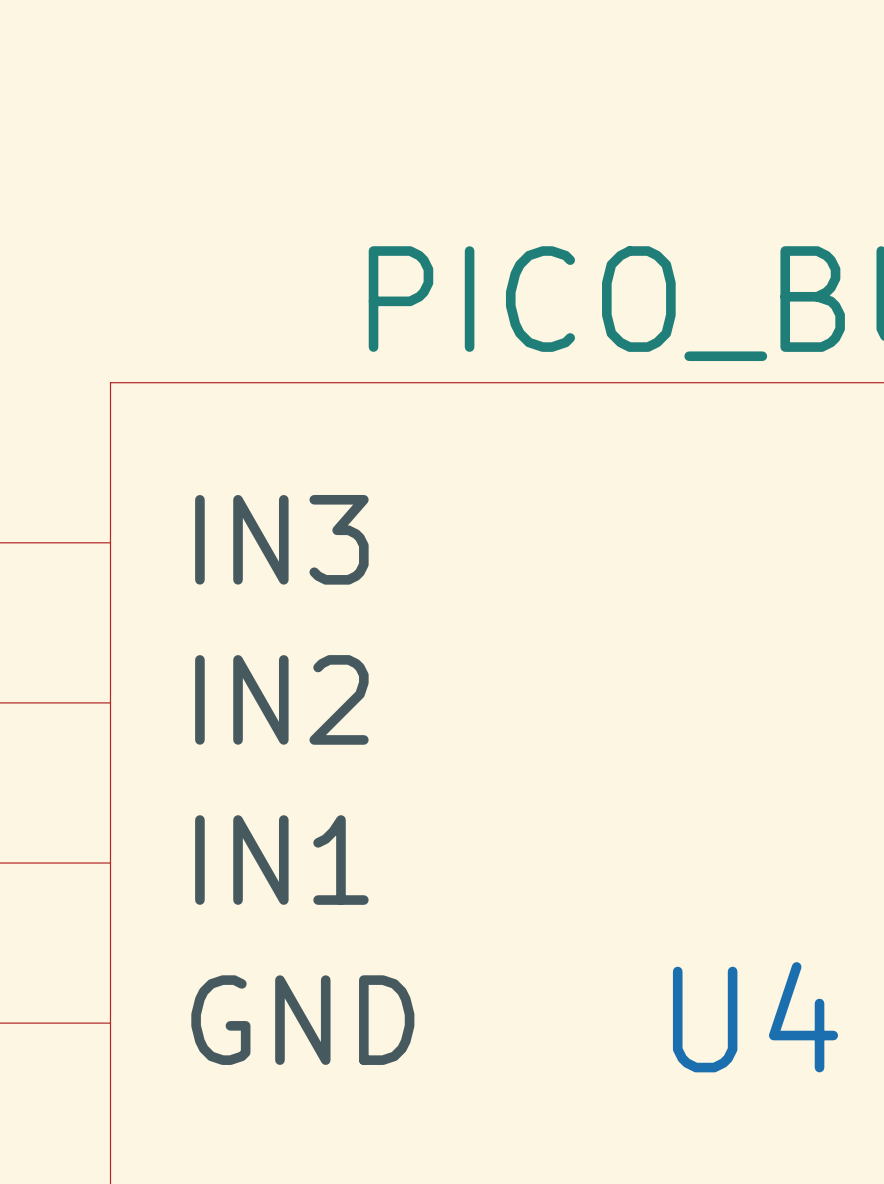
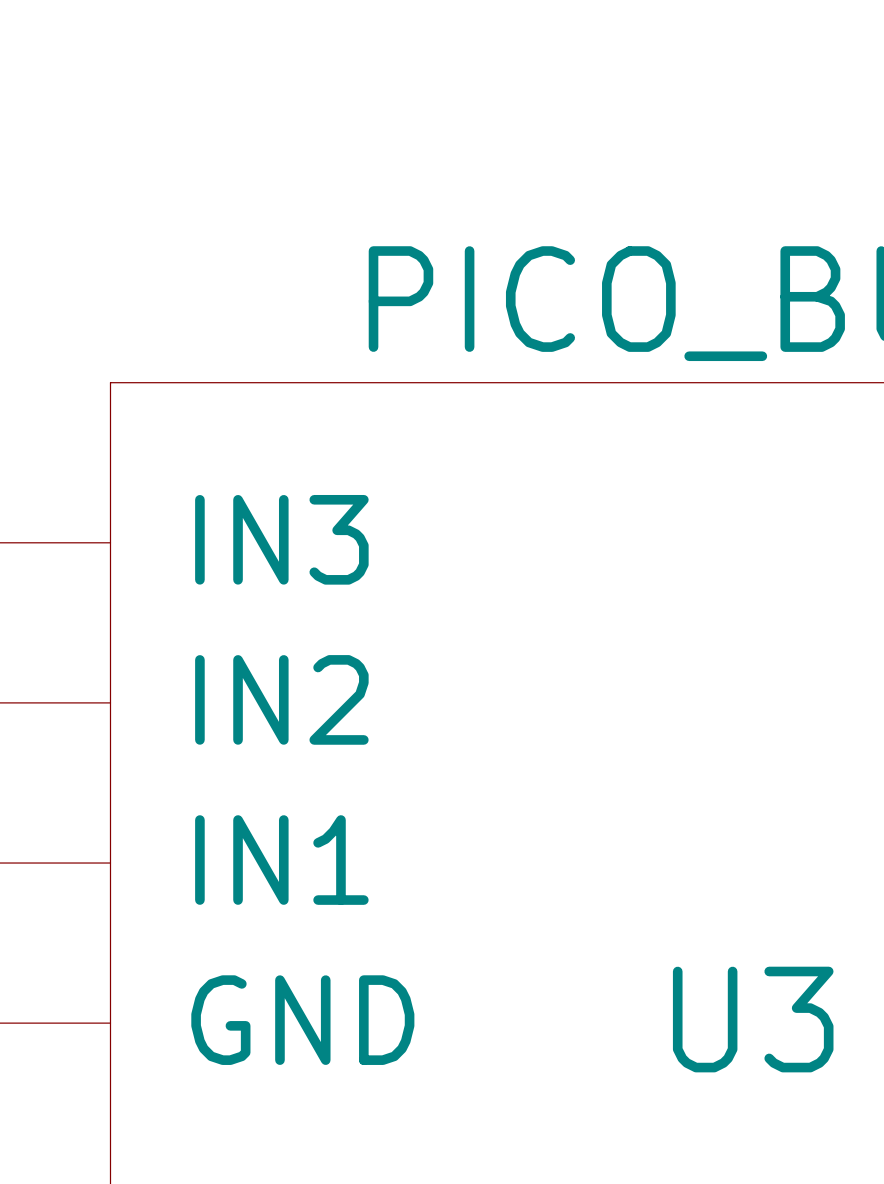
U4 name: U4 (755, 1017) -> U3 (753, 1019)

